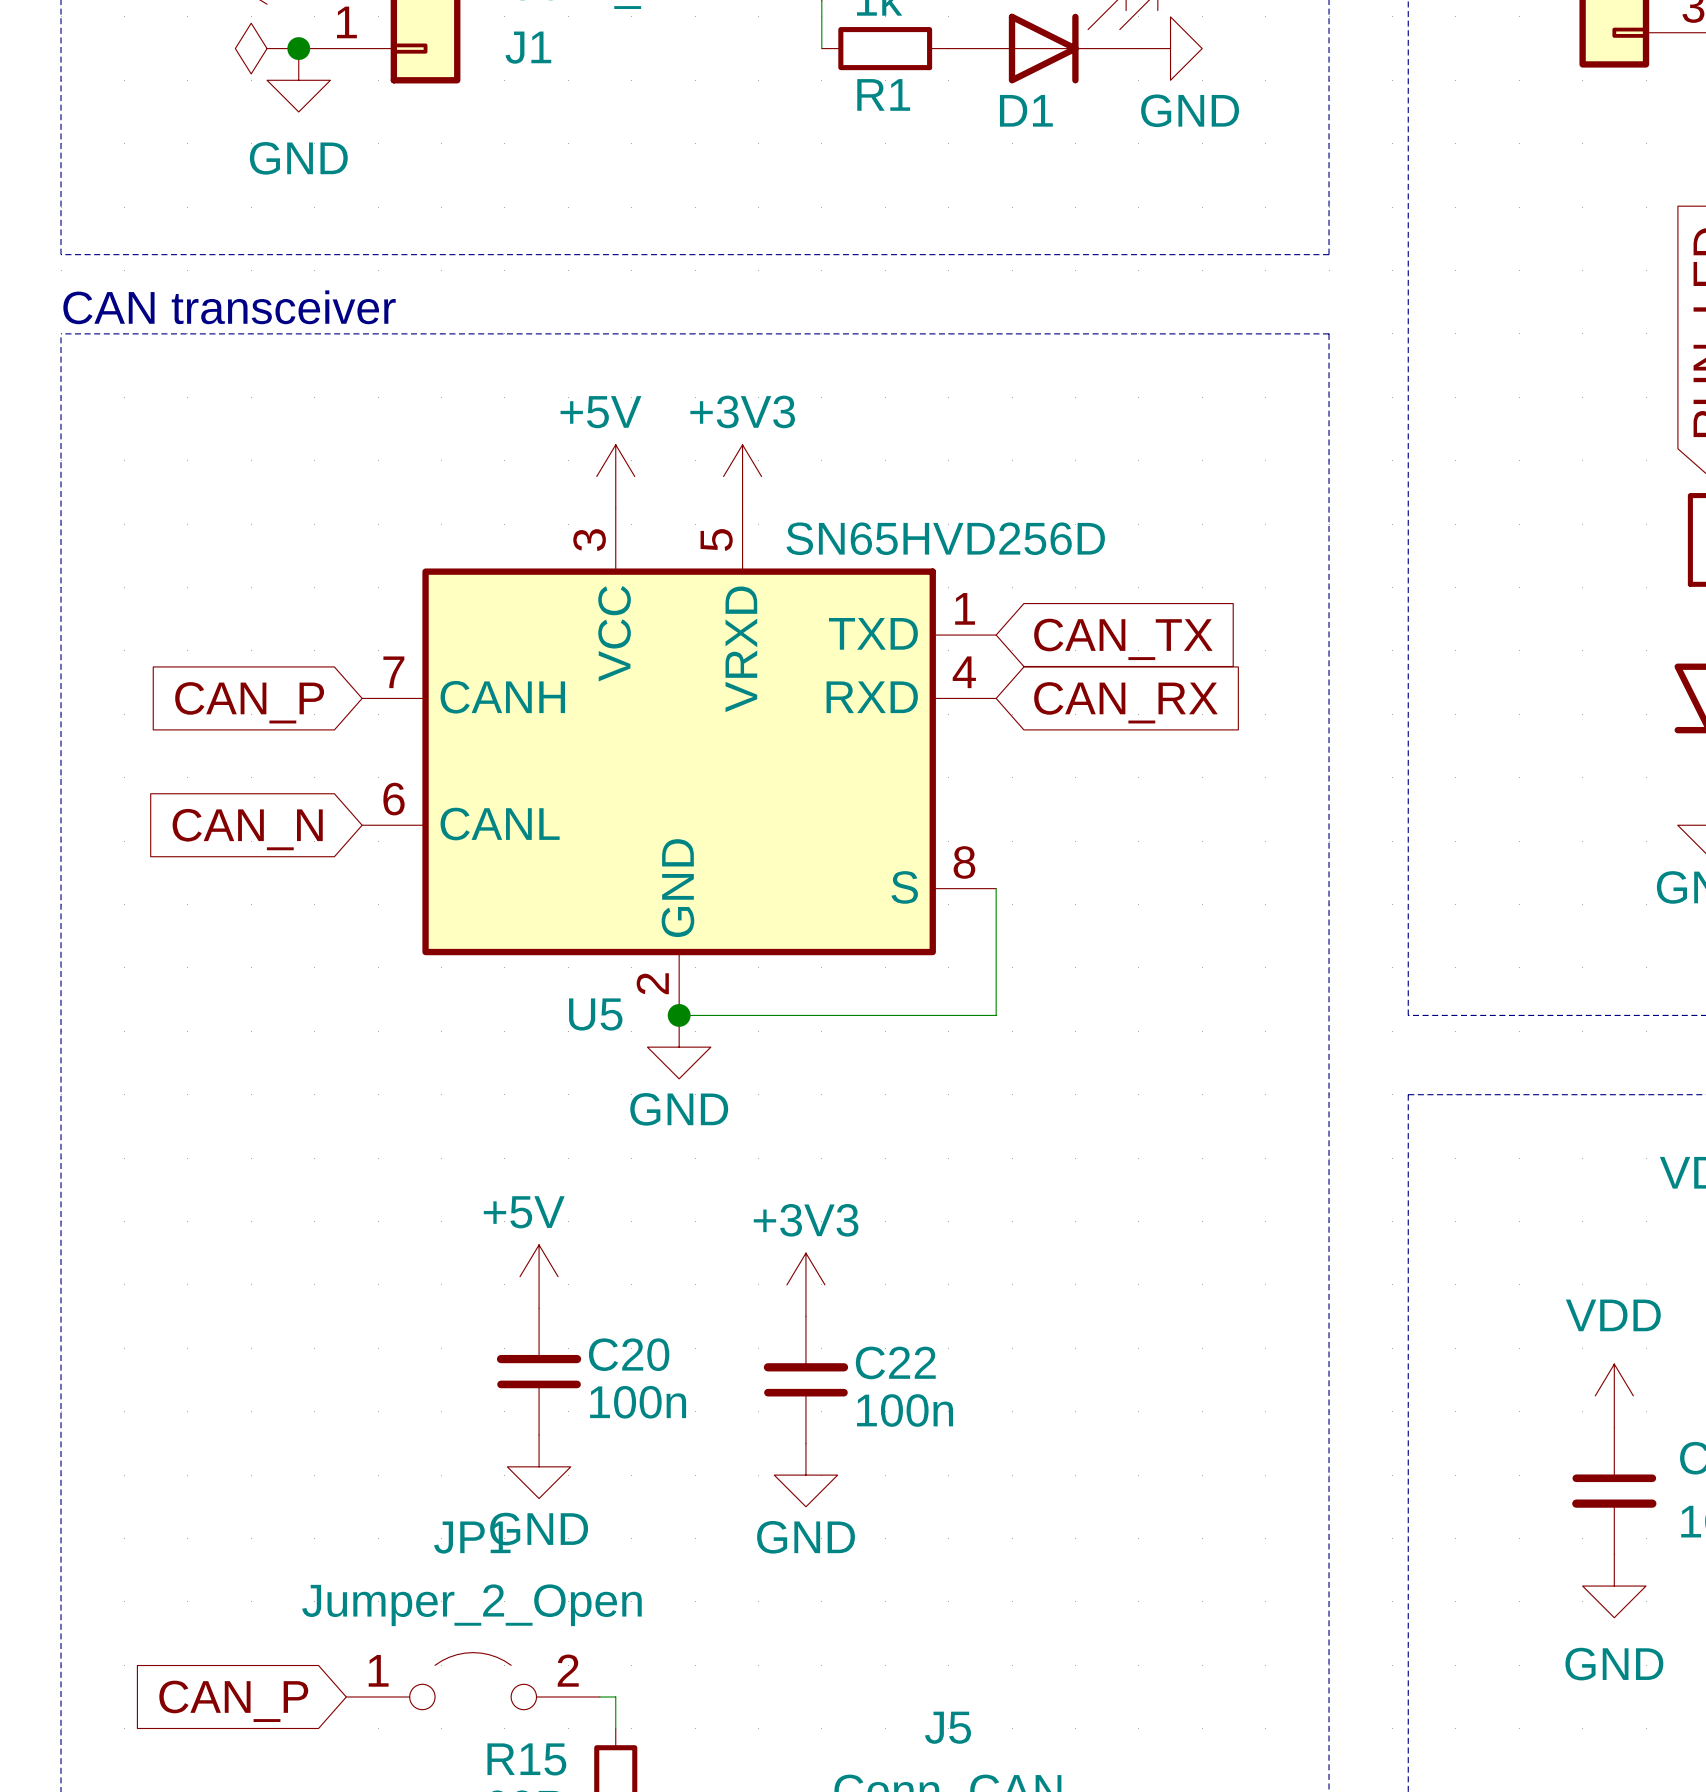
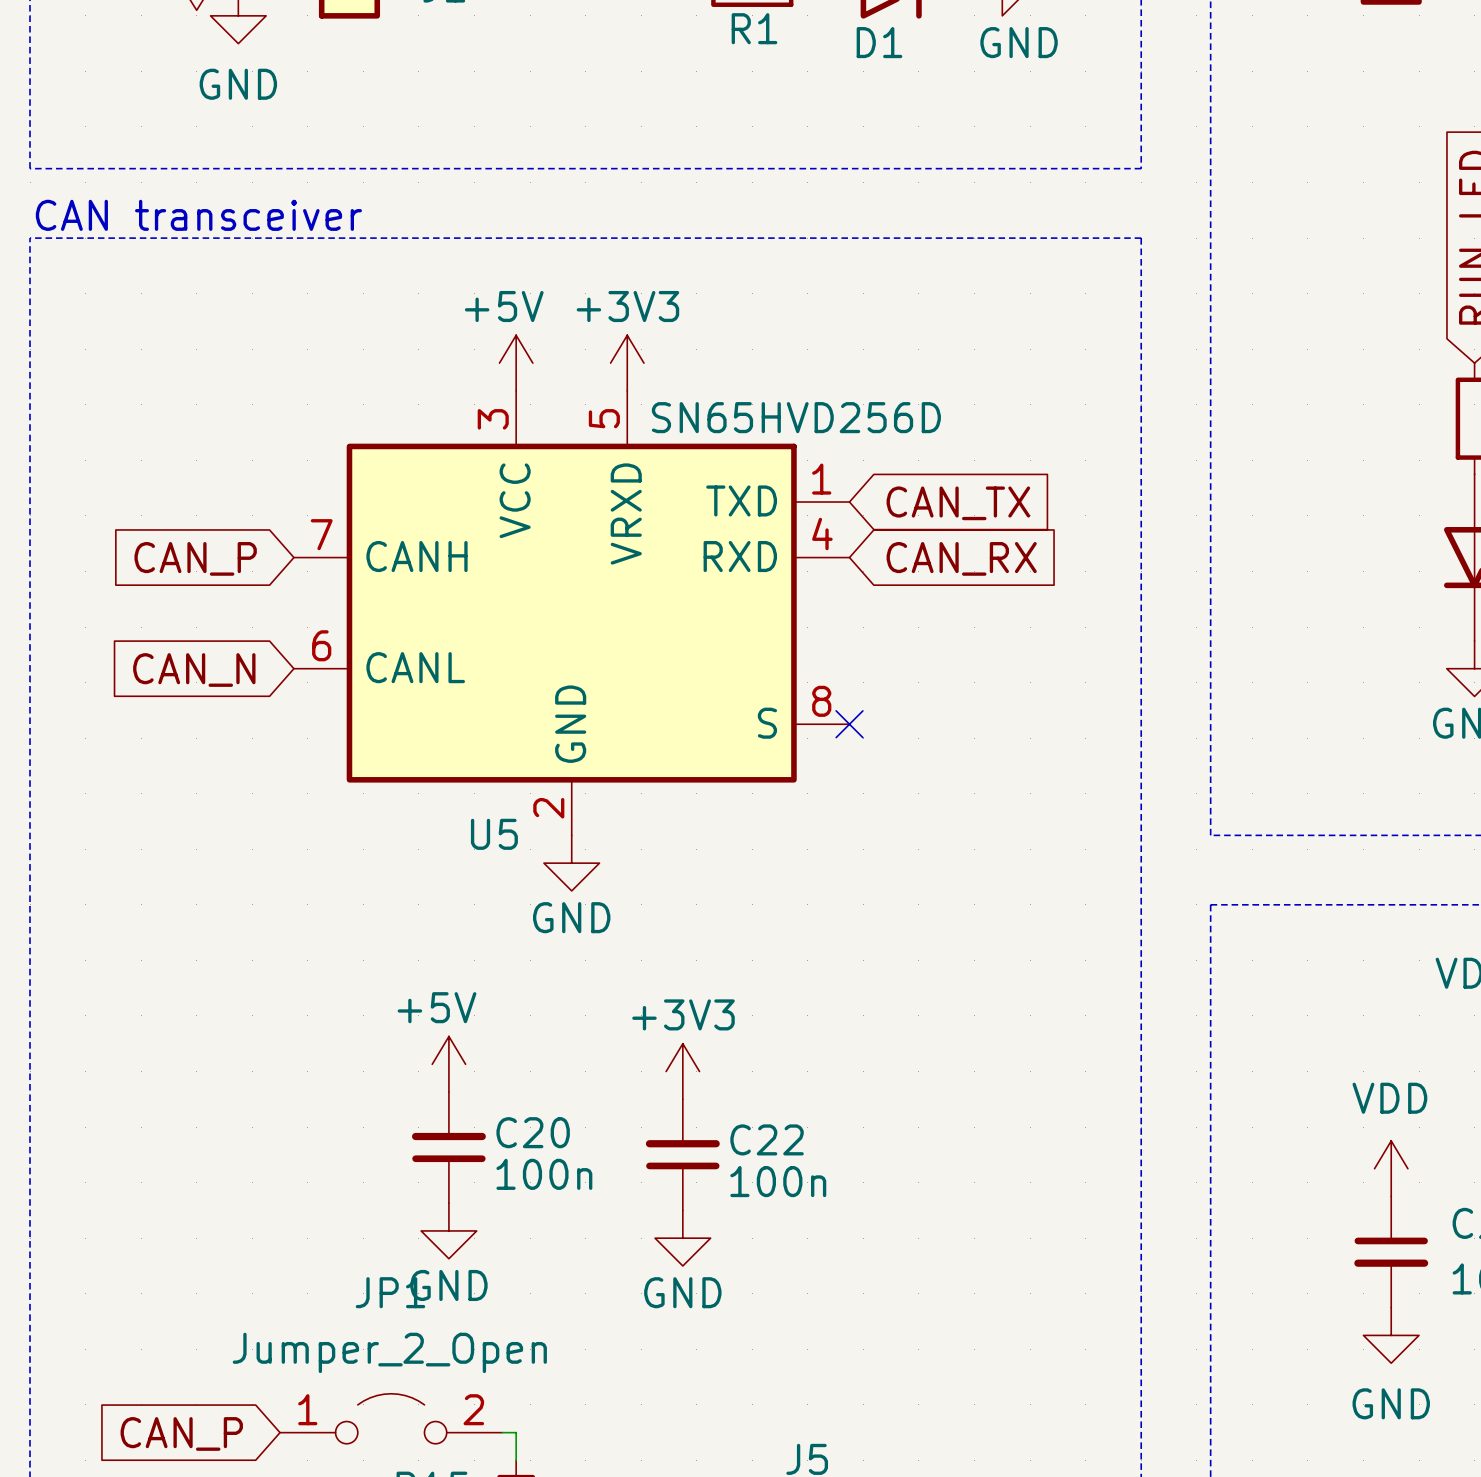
wire: (996, 888) (996, 1015) (679, 1015) -> none
no-connect mark: none -> (849, 724)
junction: (679, 1015) -> none

